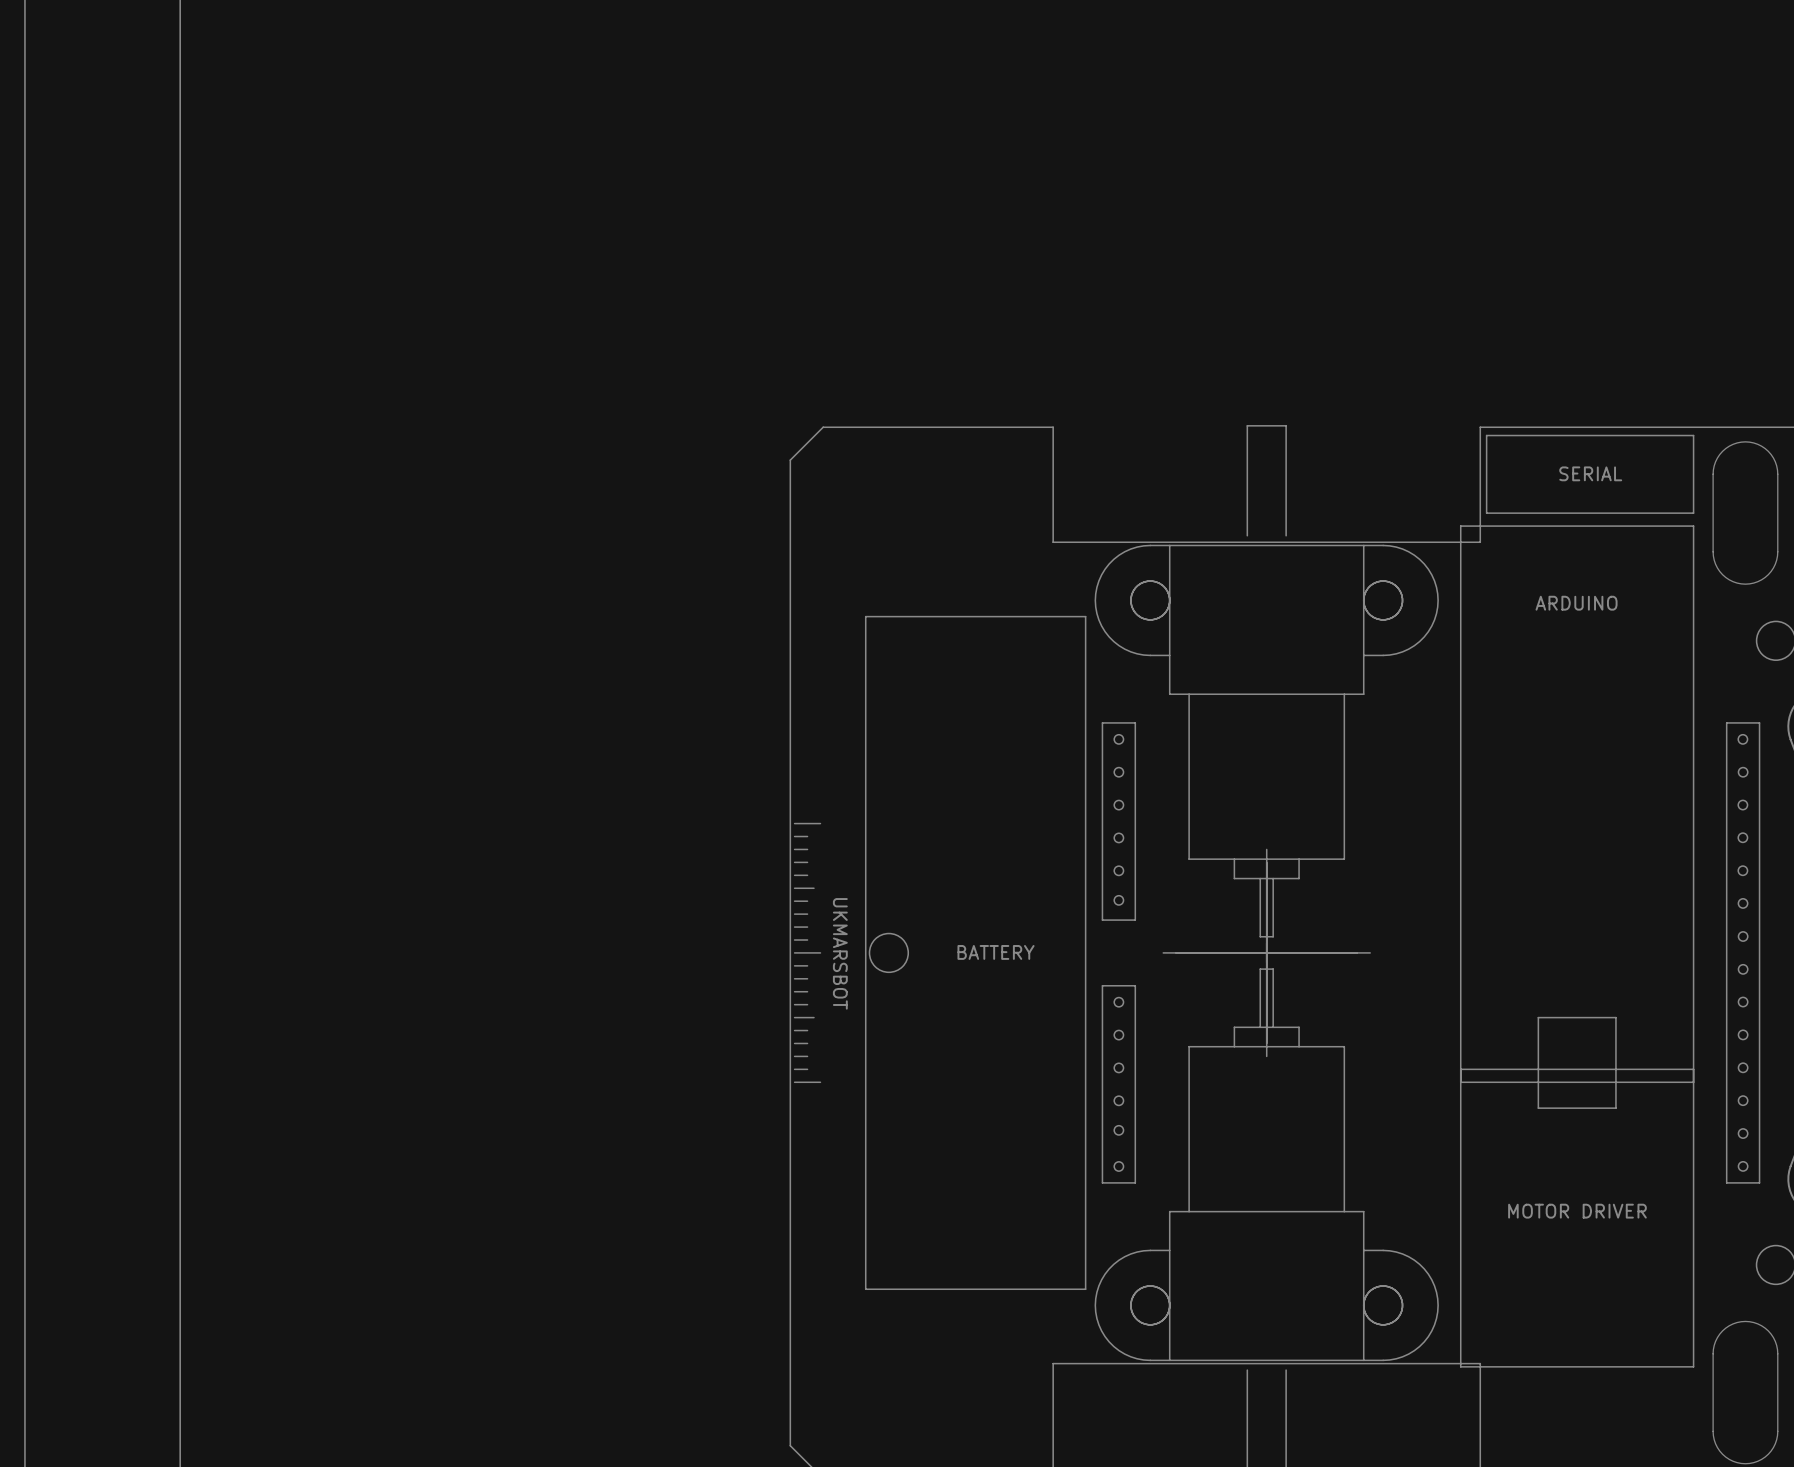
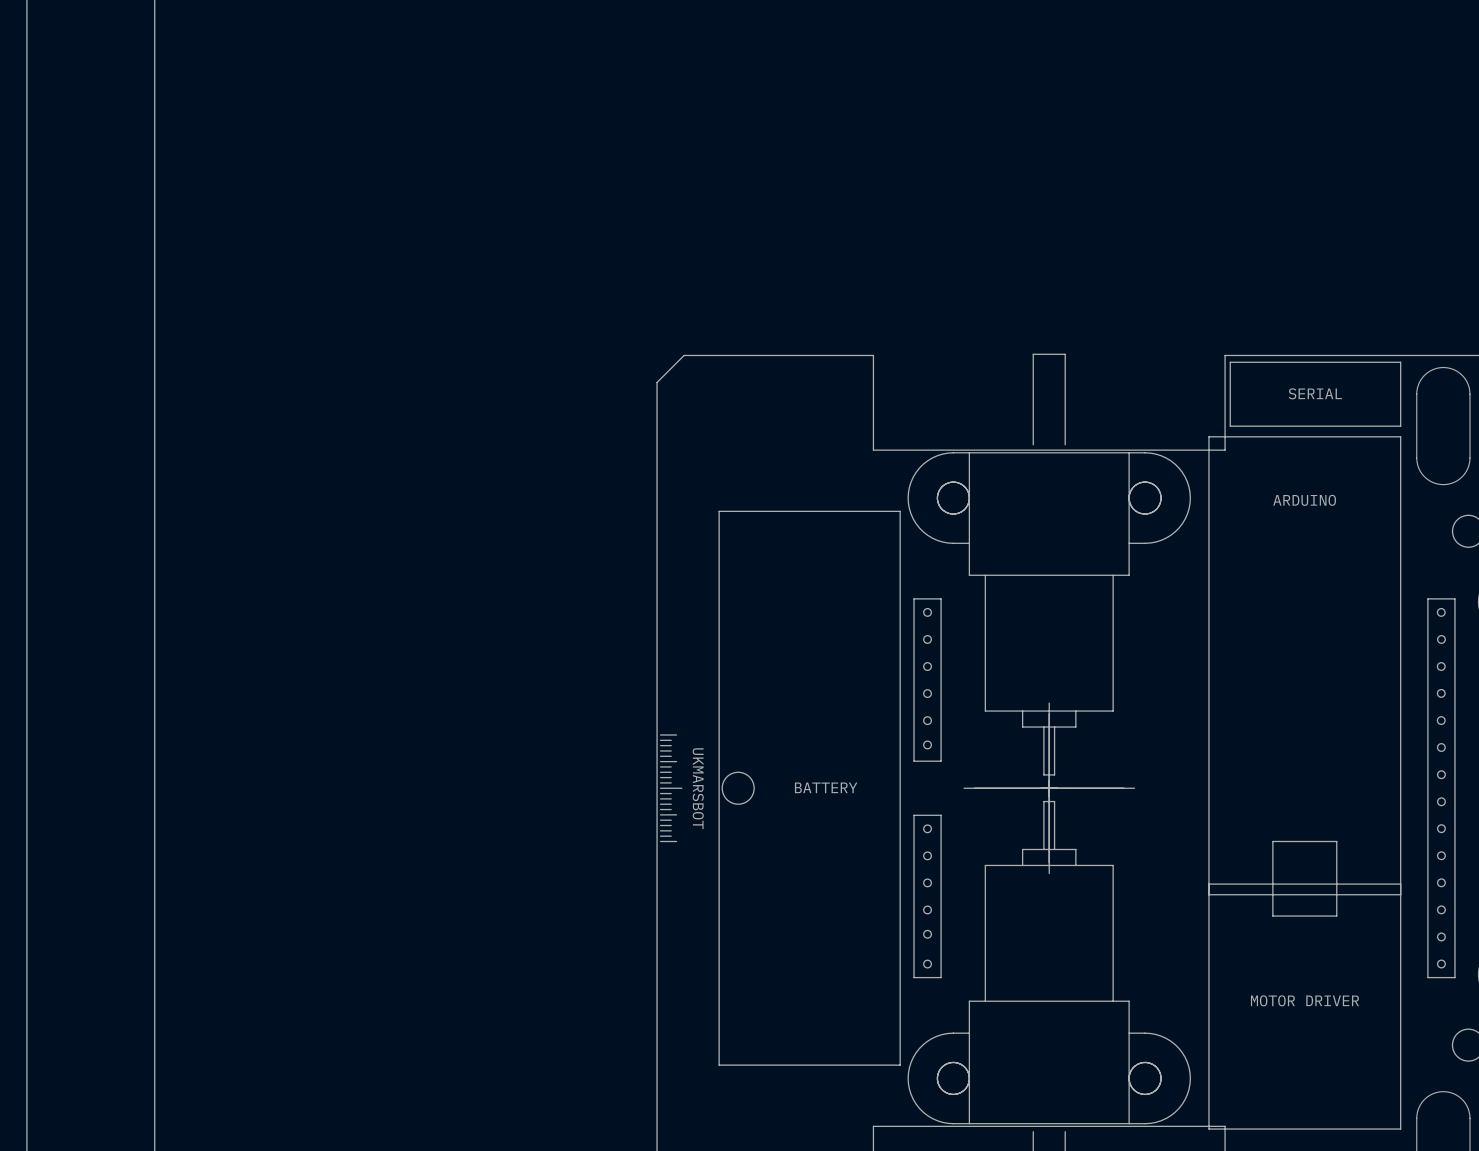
line: (794, 823) (820, 823) -> none
line: (794, 836) (807, 836) -> (660, 772) (671, 772)
line: (794, 849) (807, 849) -> (660, 782) (671, 782)
line: (794, 862) (807, 862) -> (660, 793) (671, 793)
line: (794, 875) (807, 875) -> (660, 804) (671, 804)
line: none -> (660, 761) (676, 761)
line: none -> (660, 814) (676, 814)
line: (794, 1030) (807, 1030) -> (660, 750) (671, 750)
line: (794, 1043) (807, 1043) -> (660, 740) (671, 740)
line: (794, 1056) (807, 1056) -> (660, 825) (671, 825)
line: (794, 1069) (807, 1069) -> (660, 836) (671, 836)
line: (794, 1082) (820, 1082) -> none

